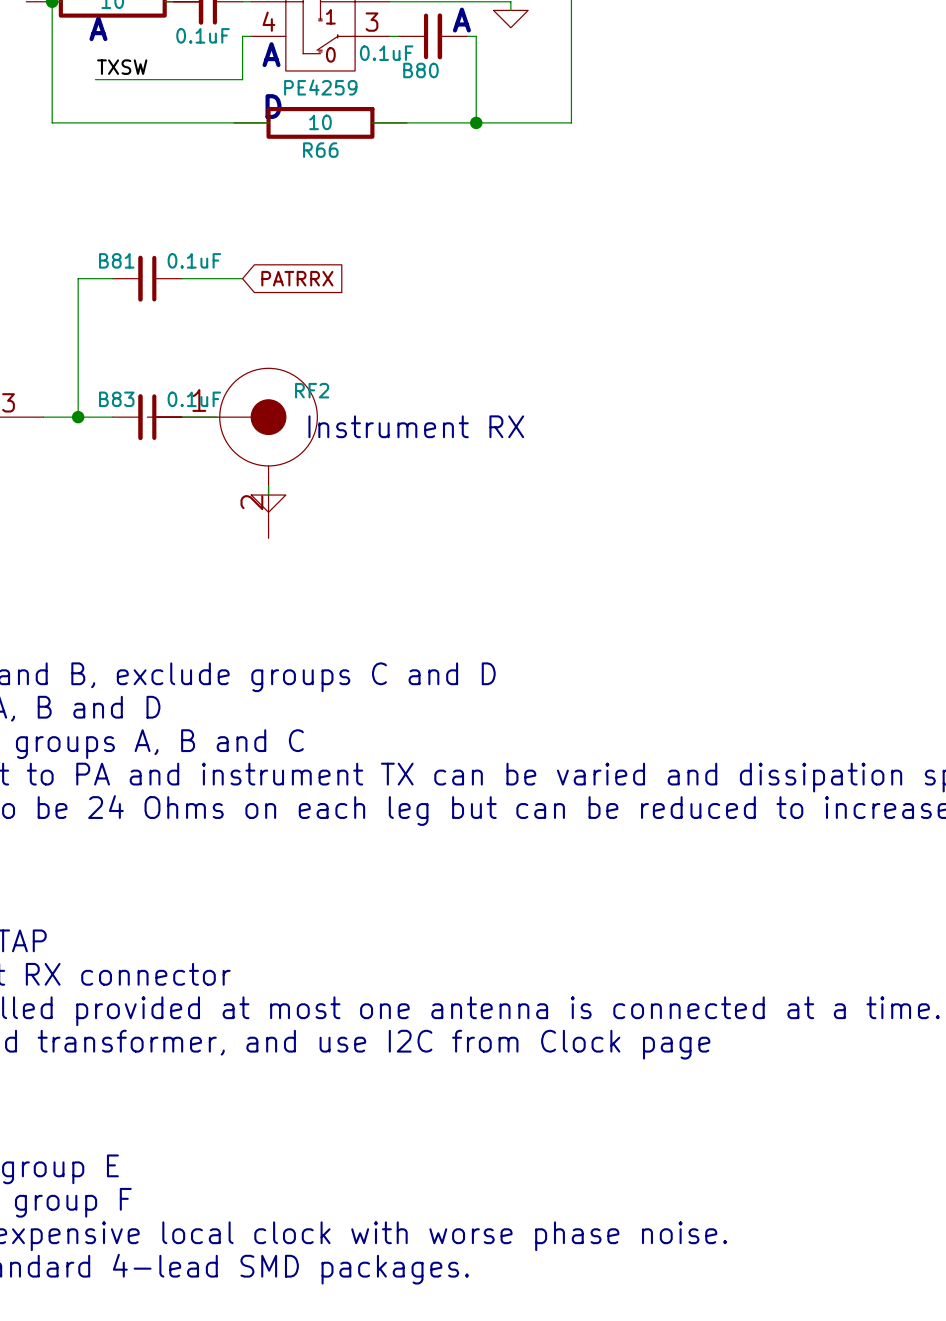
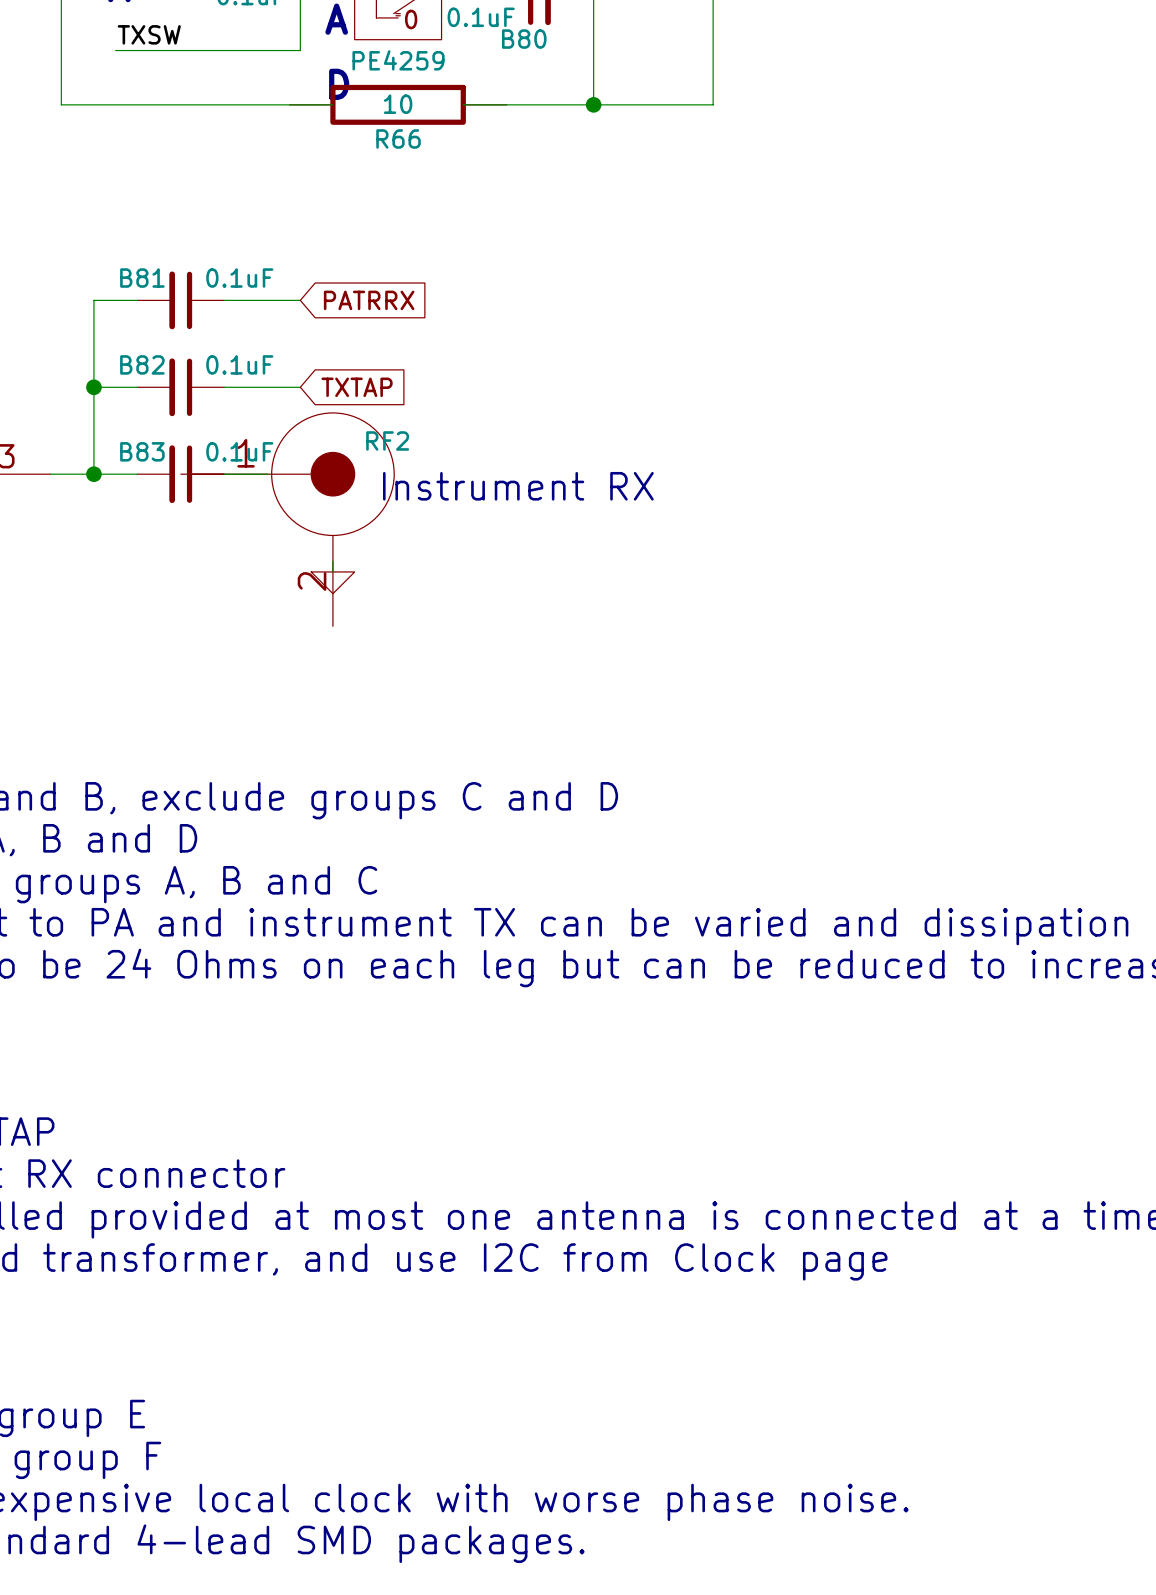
wire: none -> (93, 387) (137, 387)
junction: none -> (93, 387)
B82: none -> 0.1uF (180, 387)
wire: none -> (224, 387) (300, 387)
global label: none -> TXTAP (357, 387)

